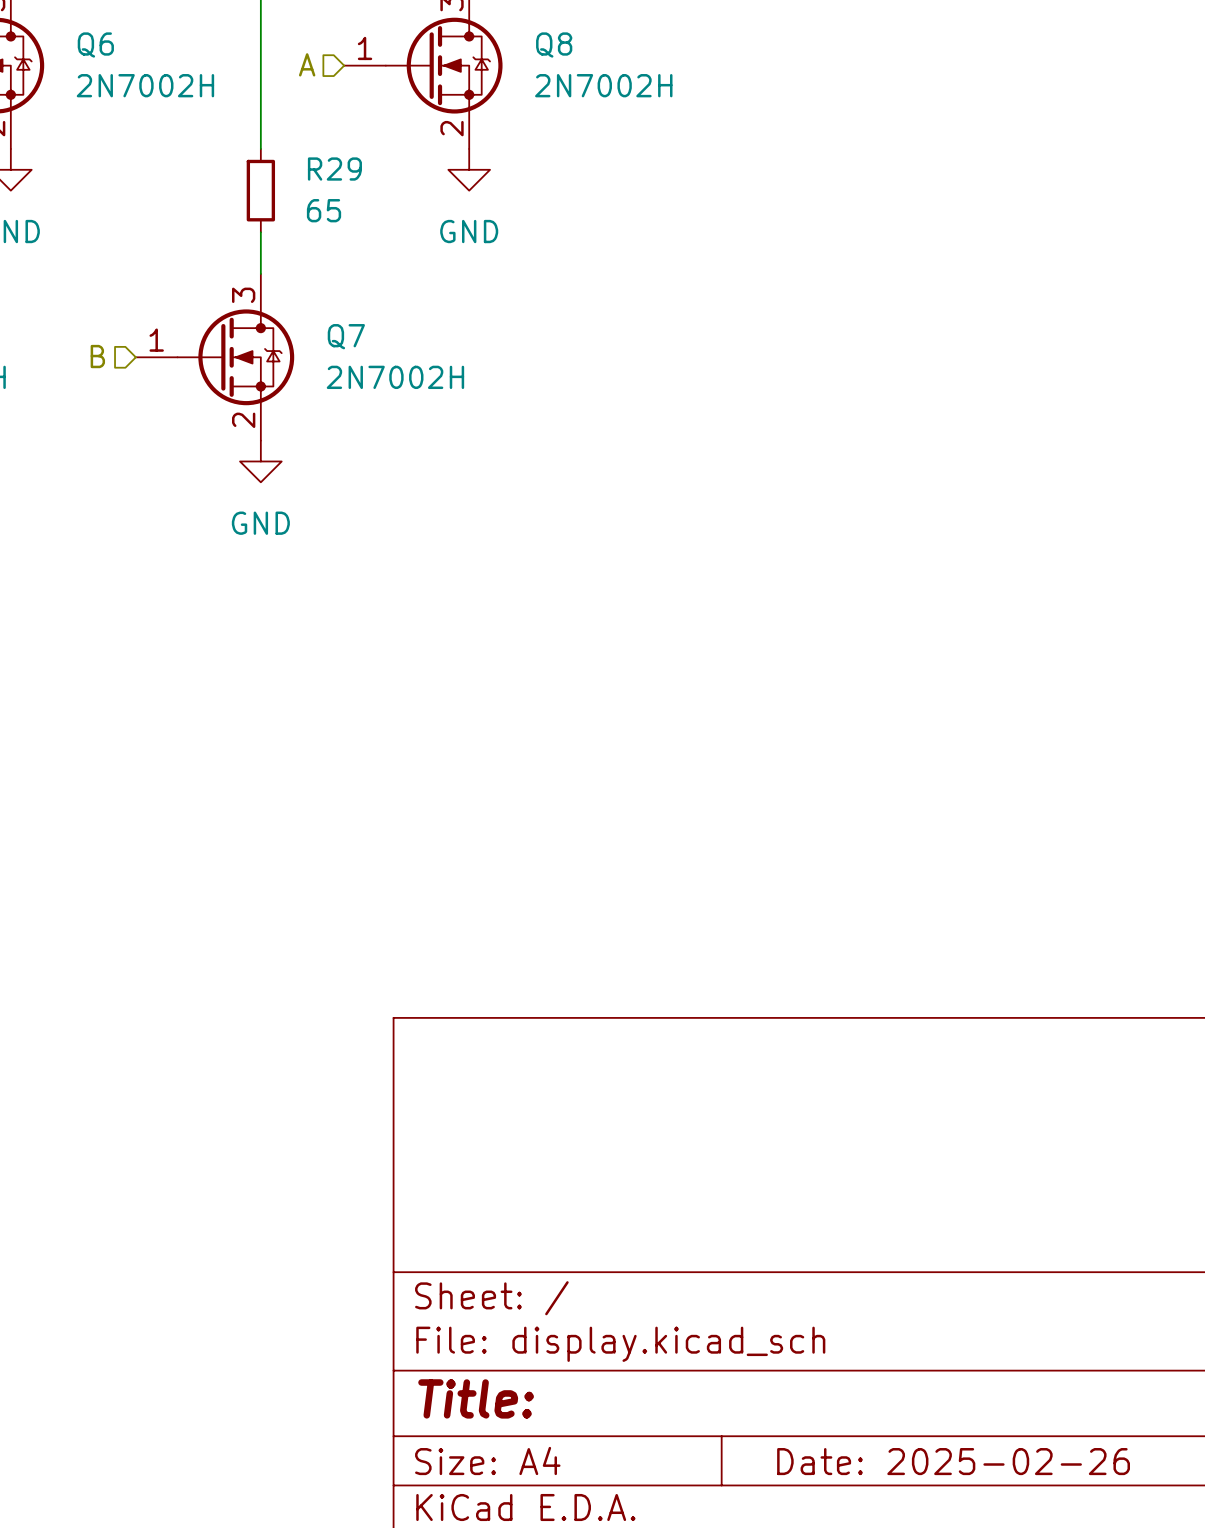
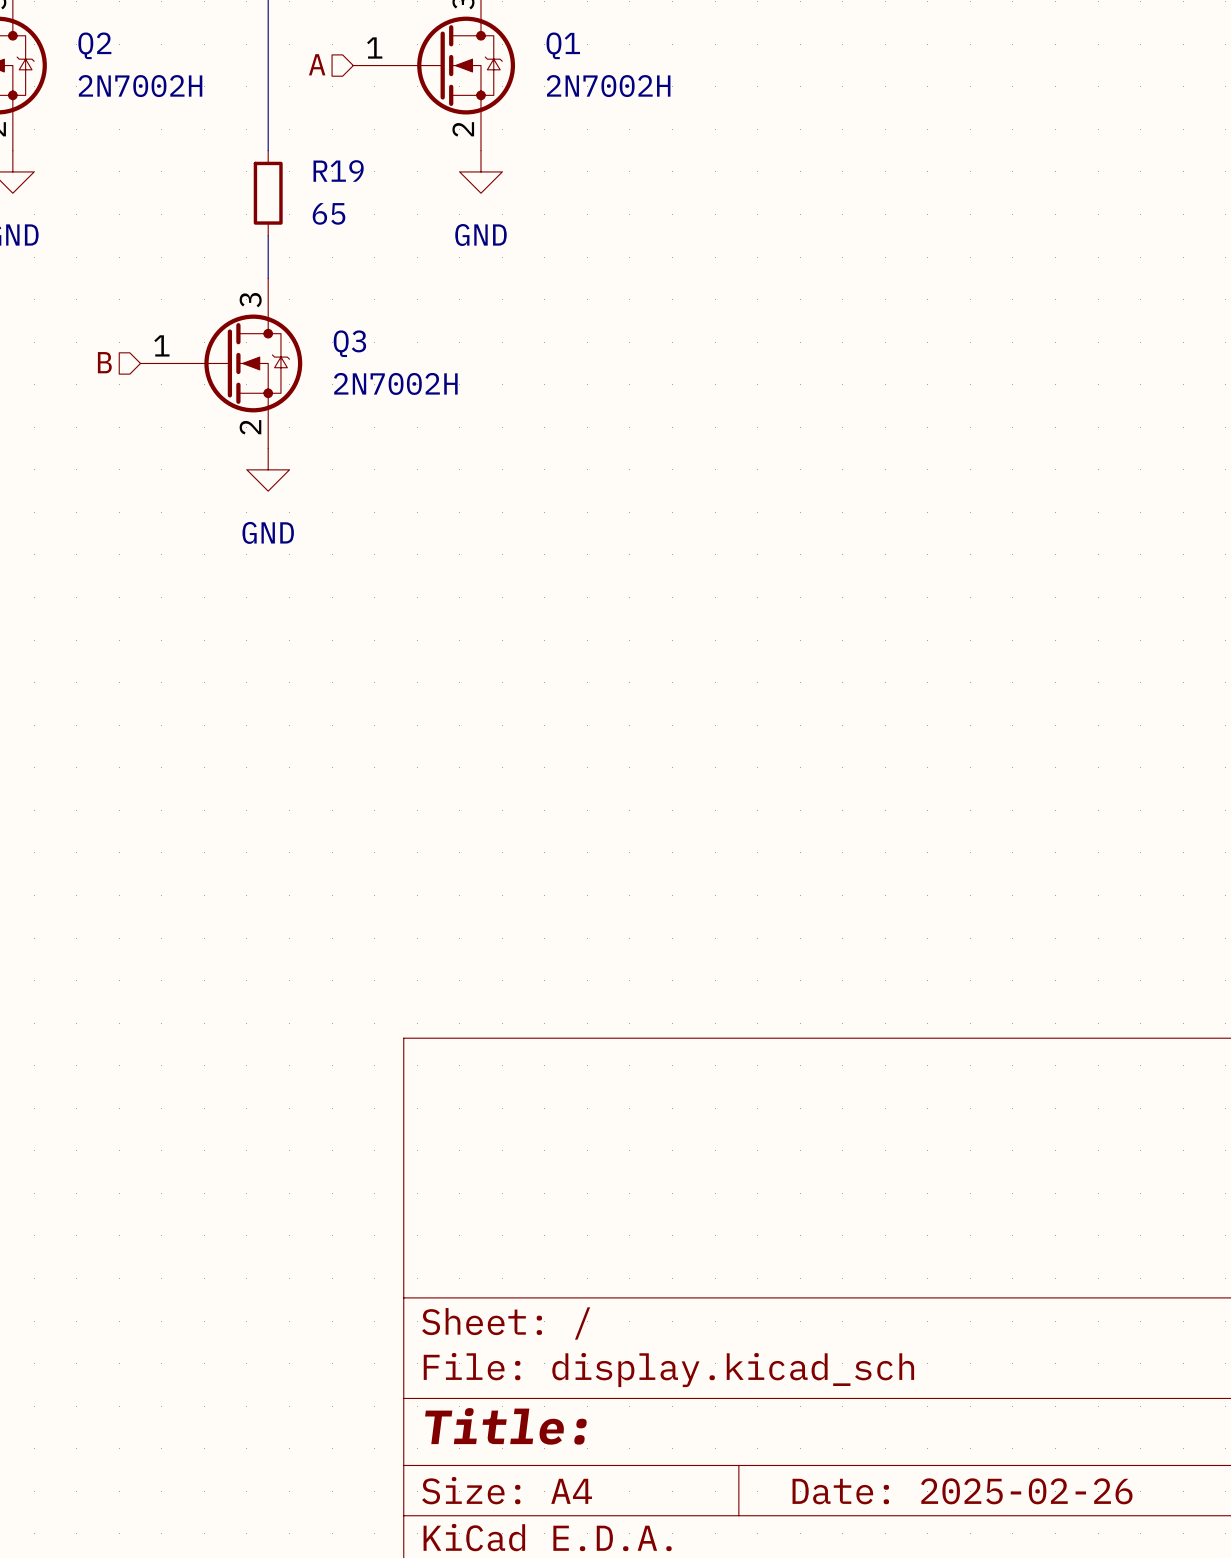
Q6 name: Q6 (95, 45) -> Q2 (94, 45)
Q8 name: Q8 (554, 45) -> Q1 (563, 45)
R29 name: R29 (334, 169) -> R19 (338, 170)
Q7 name: Q7 (346, 336) -> Q3 (349, 343)

